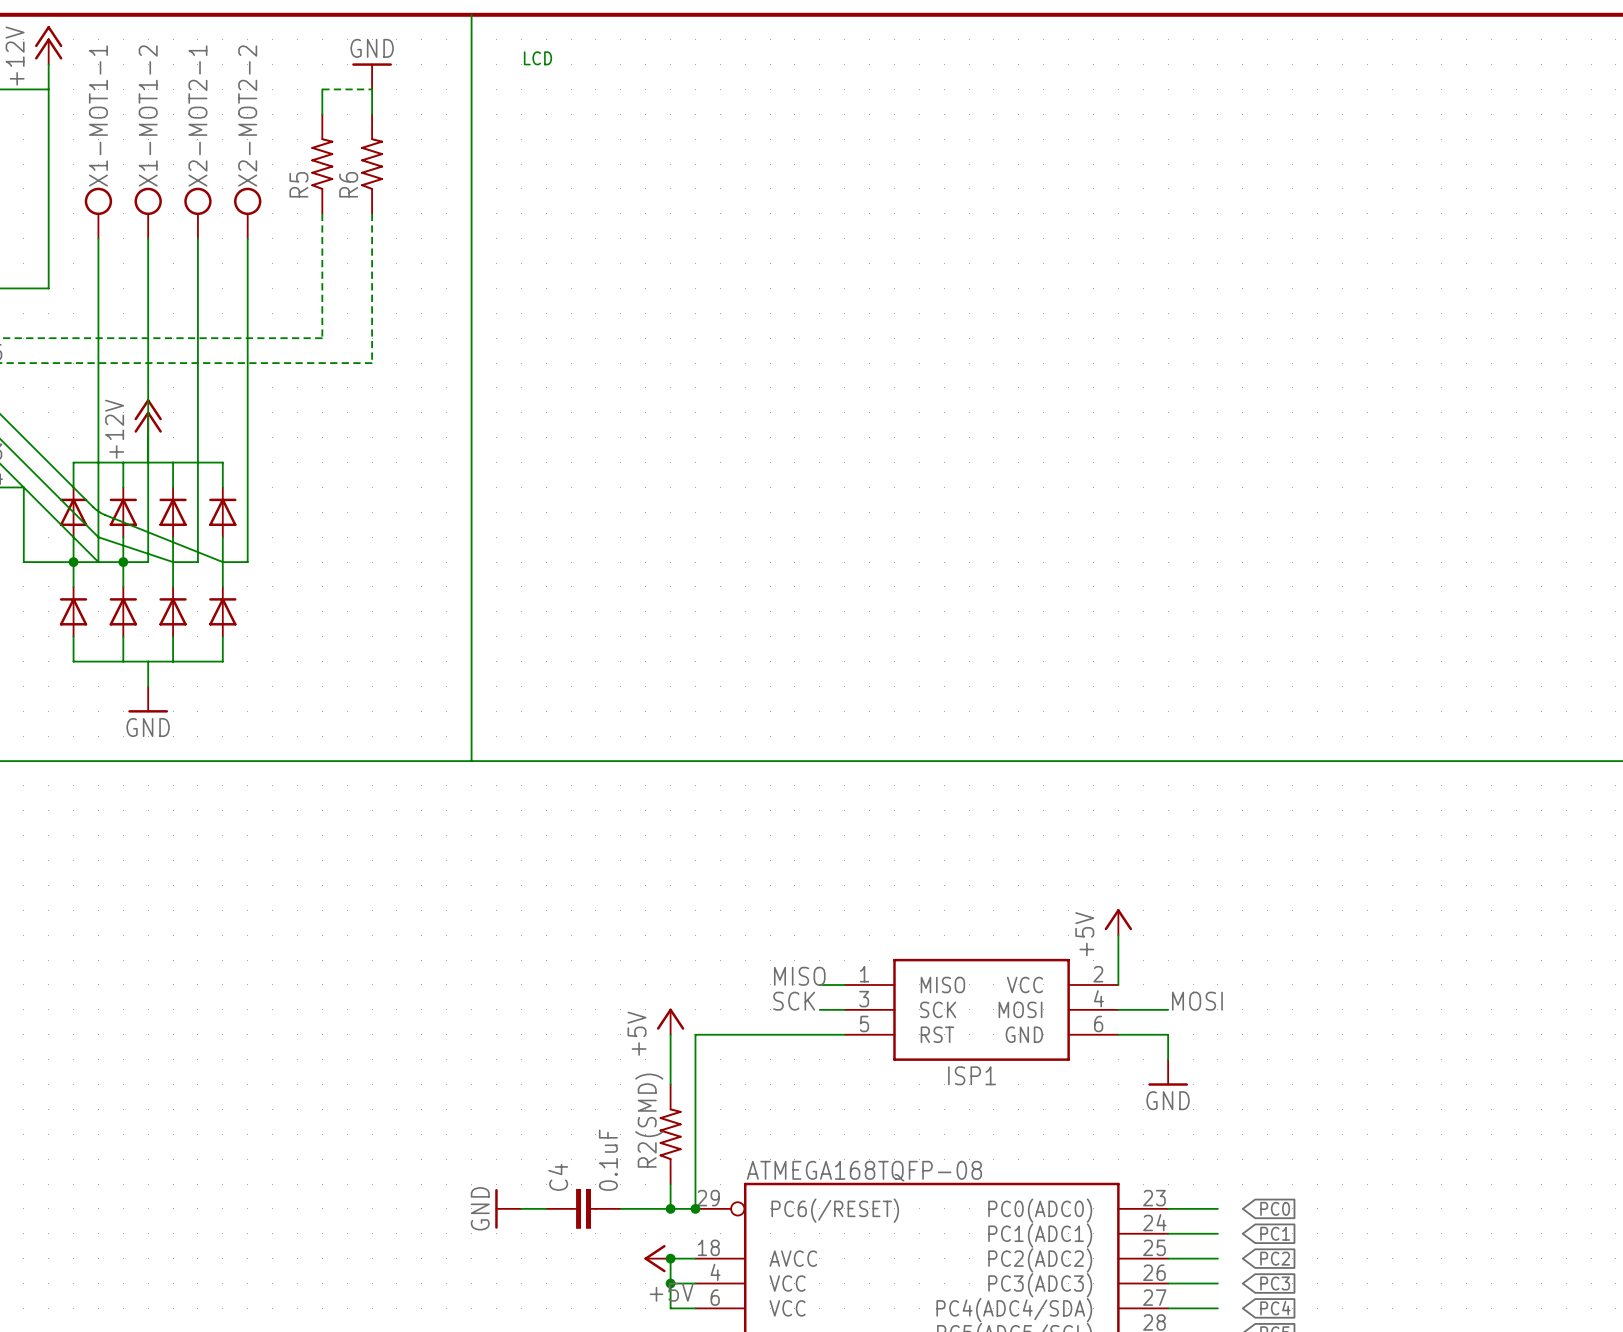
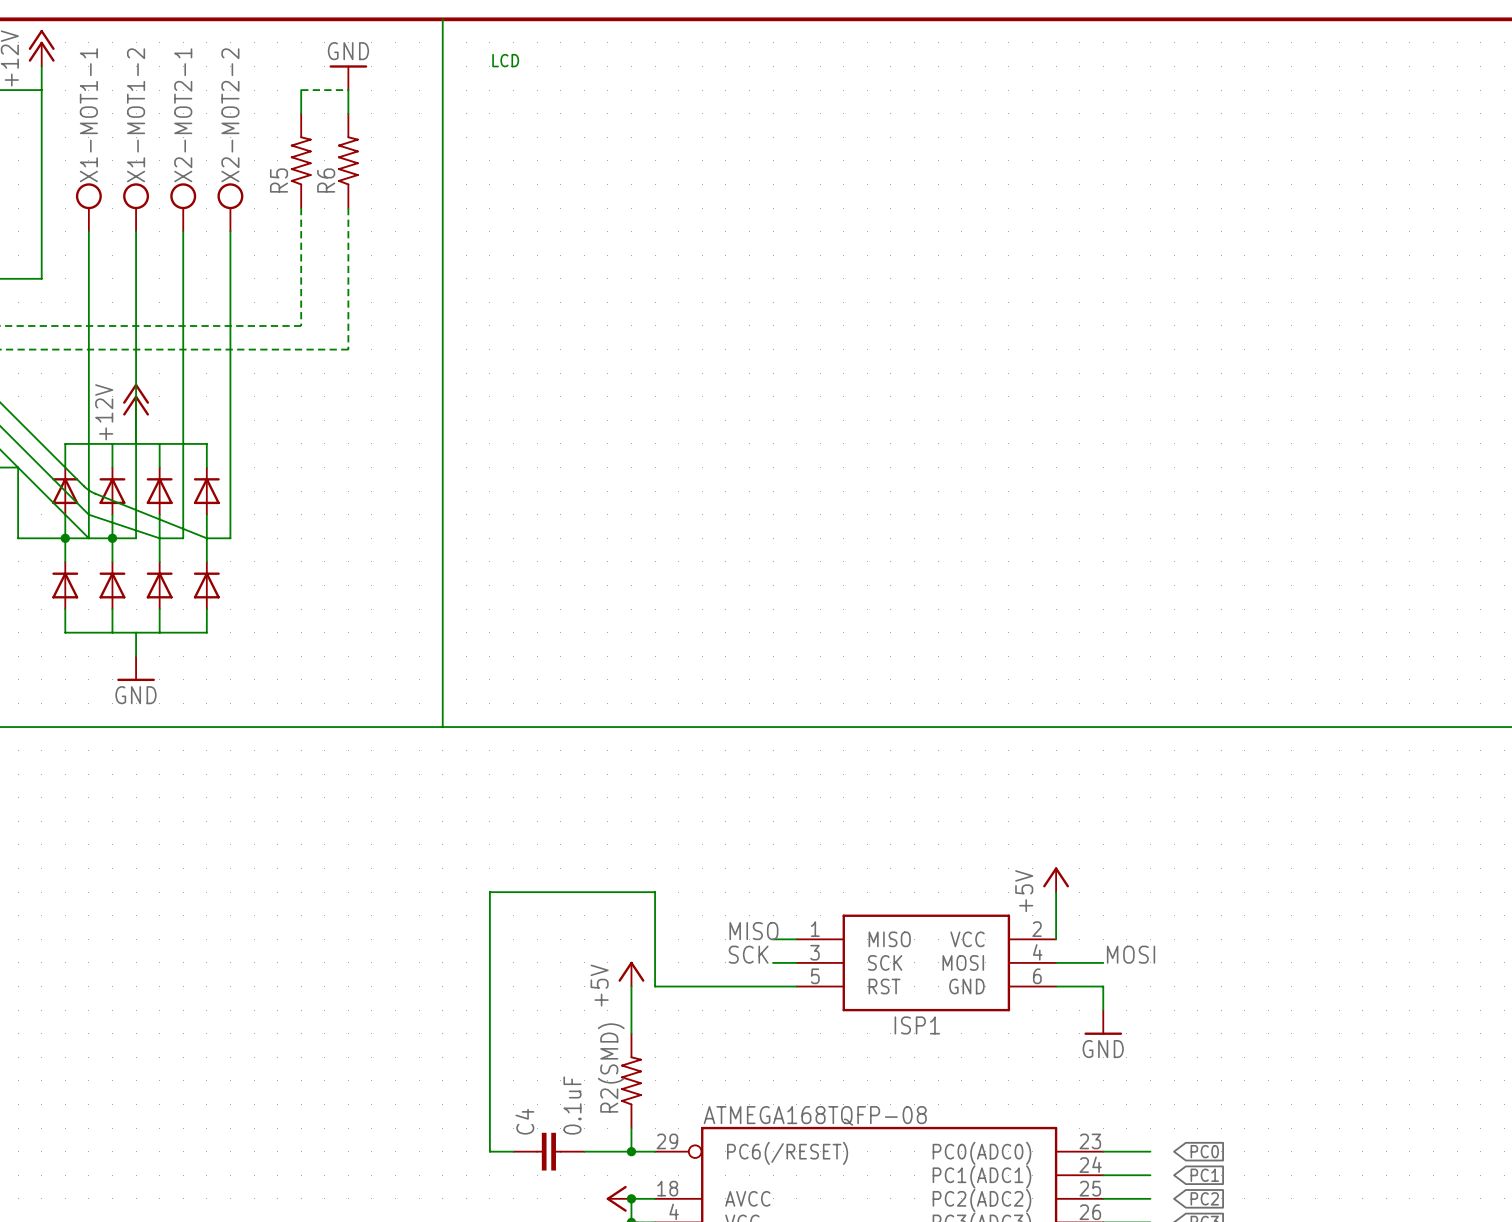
wire: (695, 1034) (695, 1208) -> (655, 986) (655, 892) (489, 892) (489, 1151)
power symbol: GND (508, 1208) -> none
junction: (695, 1208) -> none

